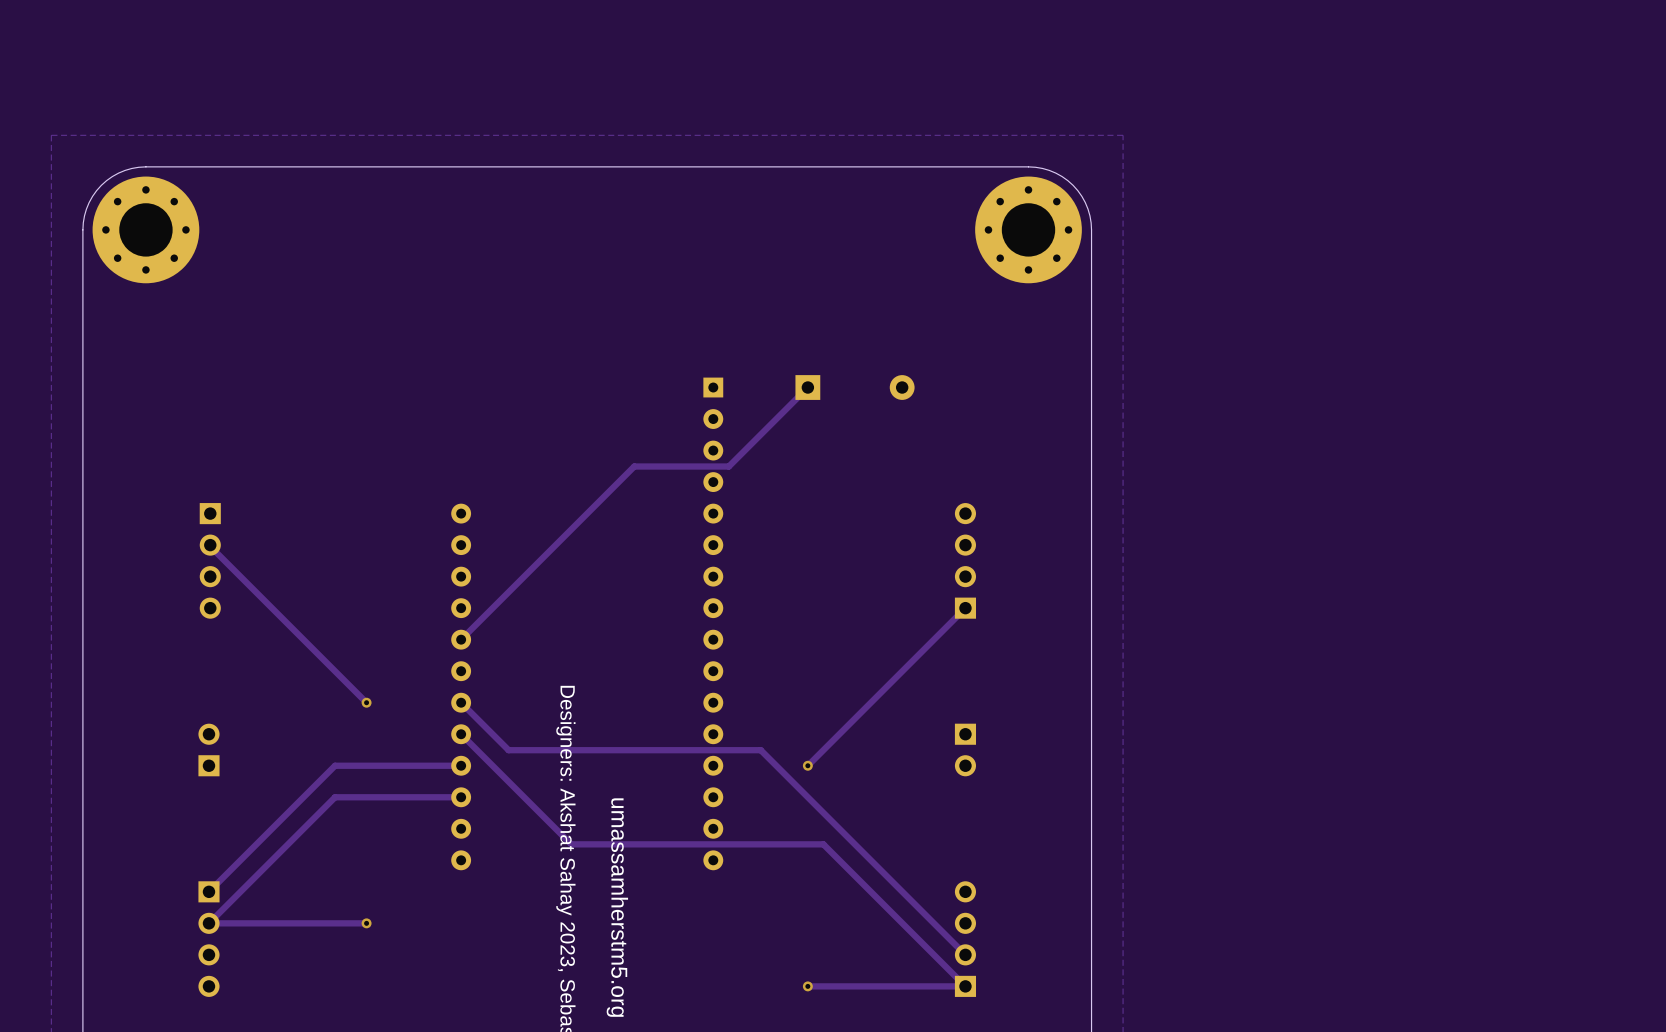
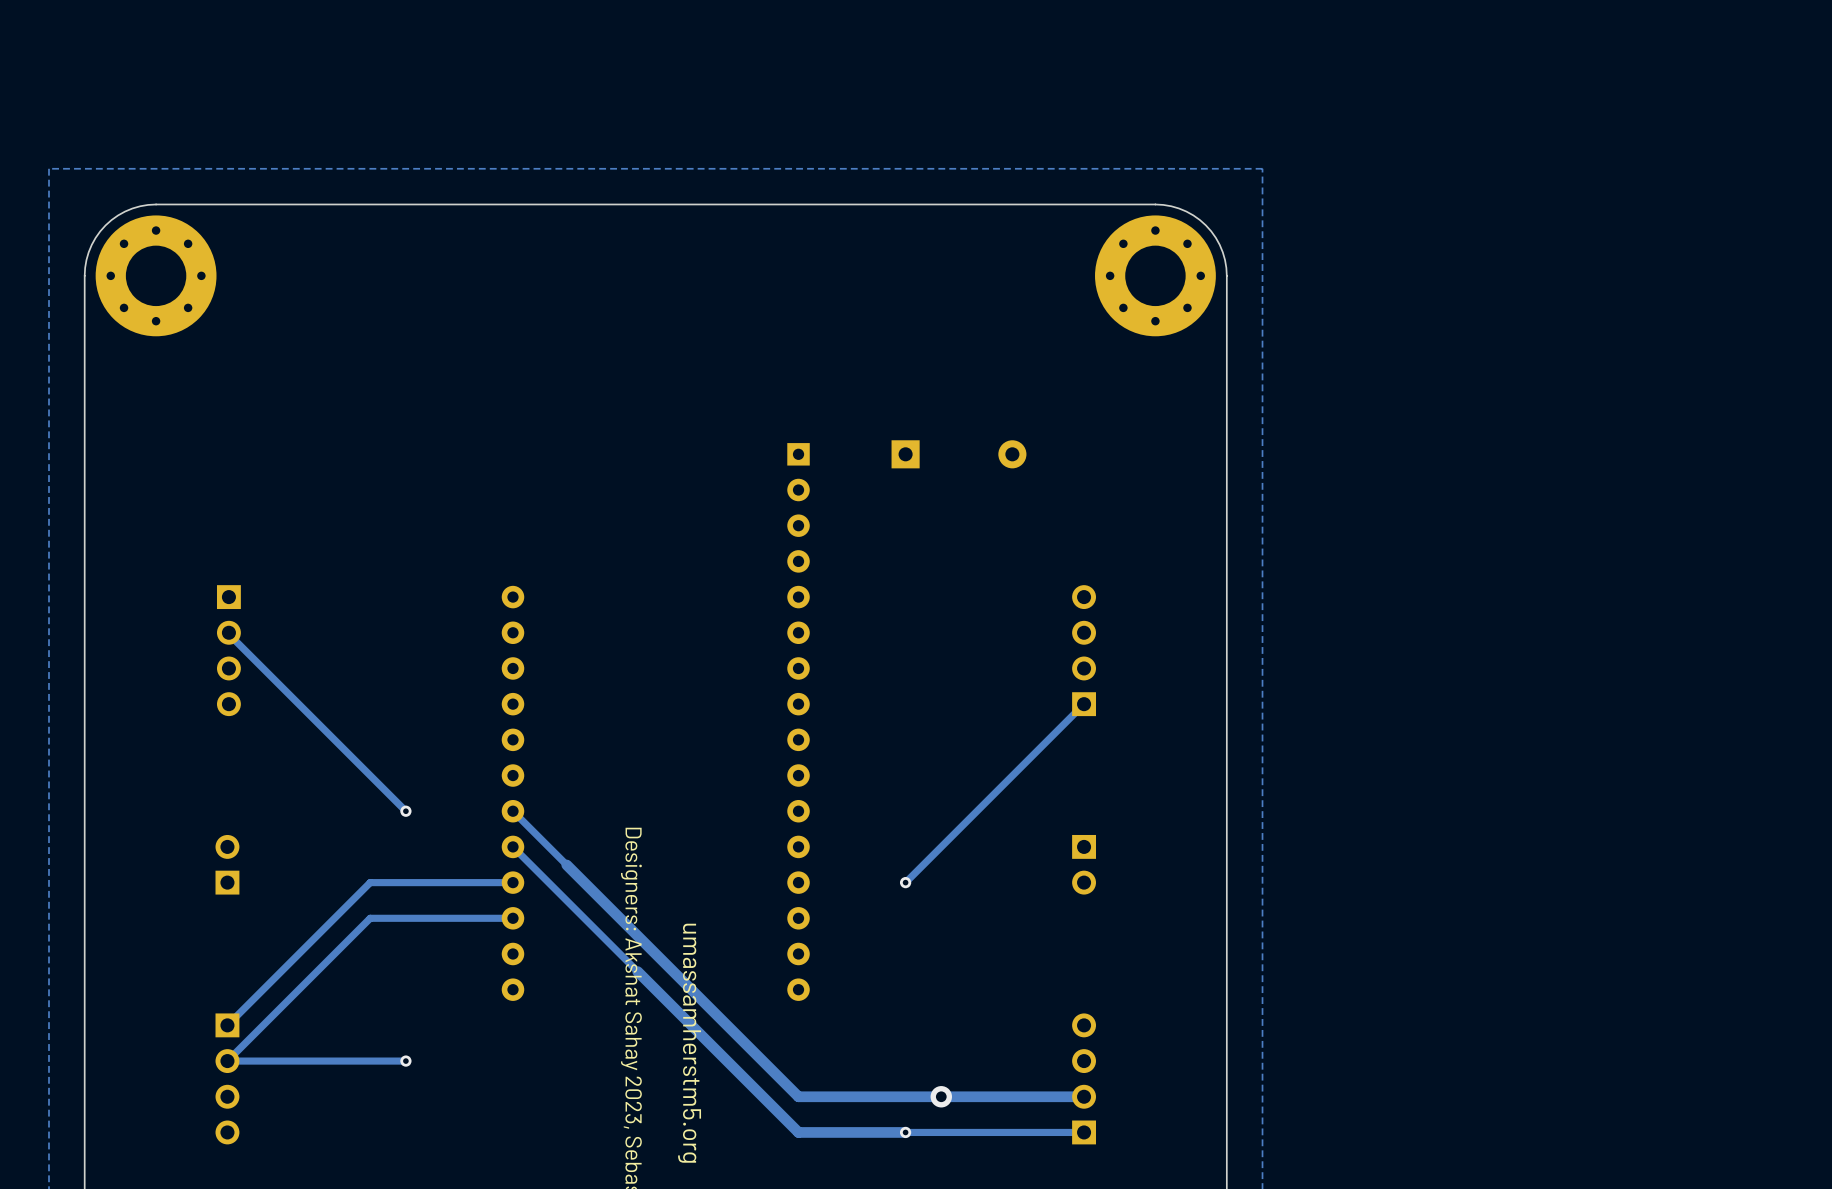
track: (807, 387) (728, 466) (634, 466) (461, 639) -> none
track: (508, 750) (760, 750) (965, 954) -> (566, 864) (798, 1096) (1084, 1096)
track: (571, 844) (823, 844) (965, 986) -> (637, 971) (798, 1132) (905, 1132)
via: none -> (941, 1096)

